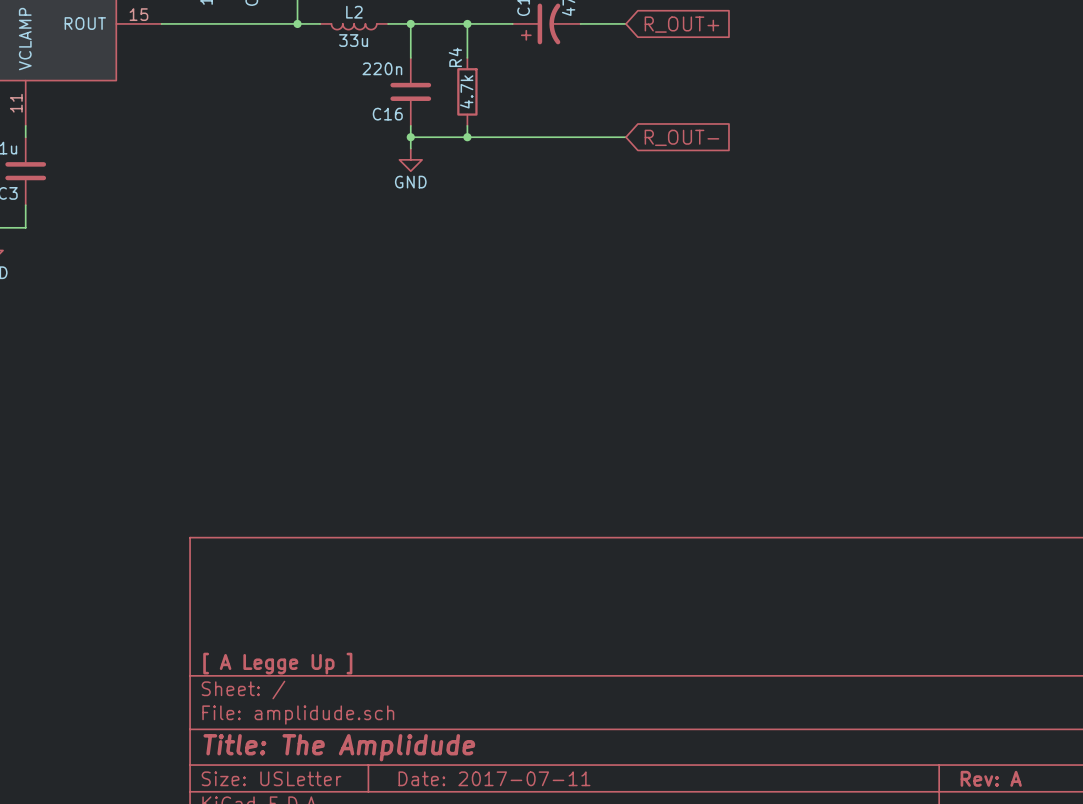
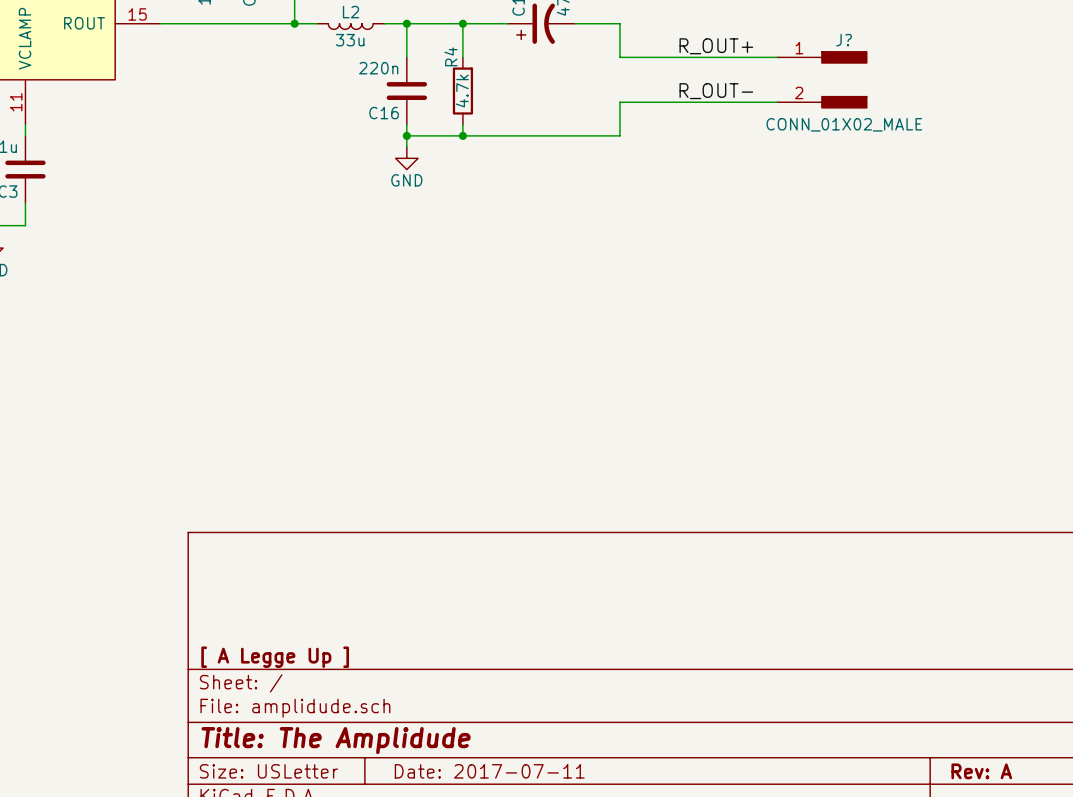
wire: none -> (619, 23) (619, 57) (777, 57)
global label: R_OUT+ (681, 24) -> none
label: none -> R_OUT+ (716, 46)
J?: none -> CONN_01X02_MALE (821, 79)
label: none -> R_OUT- (716, 91)
wire: none -> (777, 102) (619, 102) (619, 135)
global label: R_OUT- (681, 137) -> none

